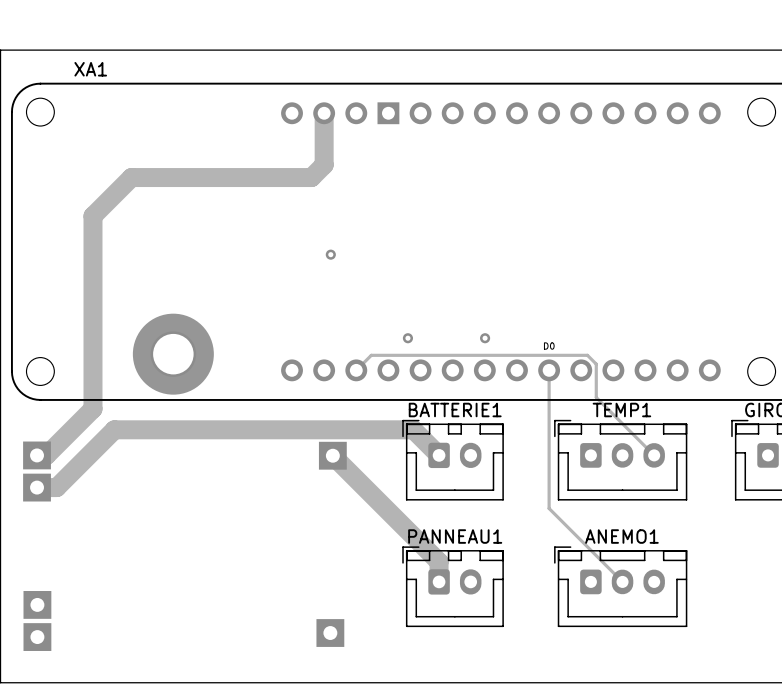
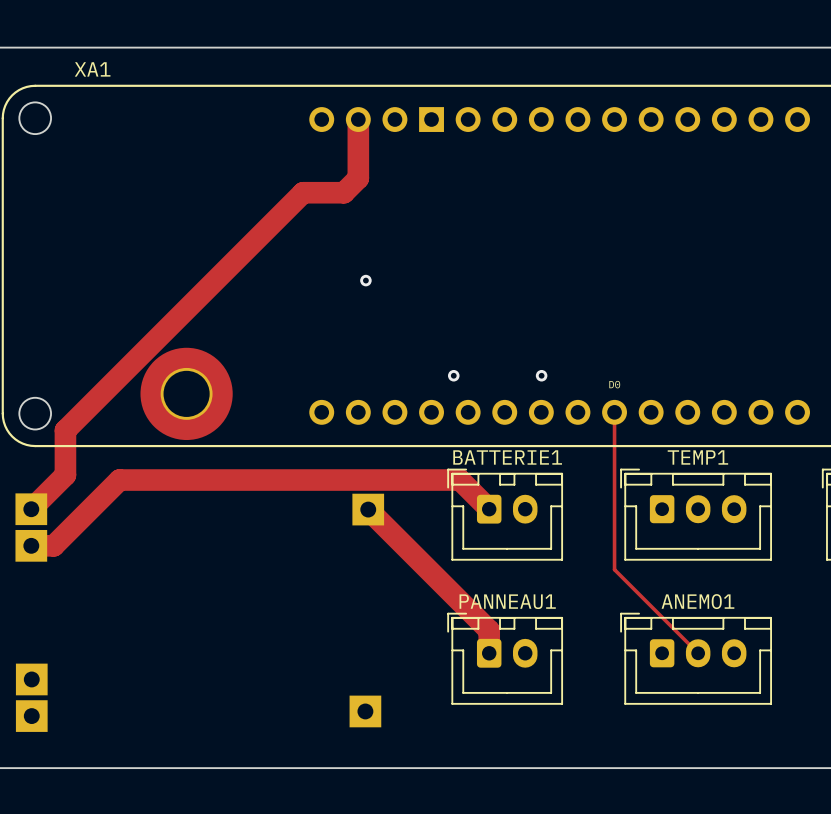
track: (275, 177) (131, 177) (92, 216) (92, 408) (46, 455) (37, 455) -> (303, 192) (65, 430) (65, 475) (31, 509)
track: (356, 370) (371, 355) (587, 355) (596, 364) (596, 397) (654, 455) -> none

